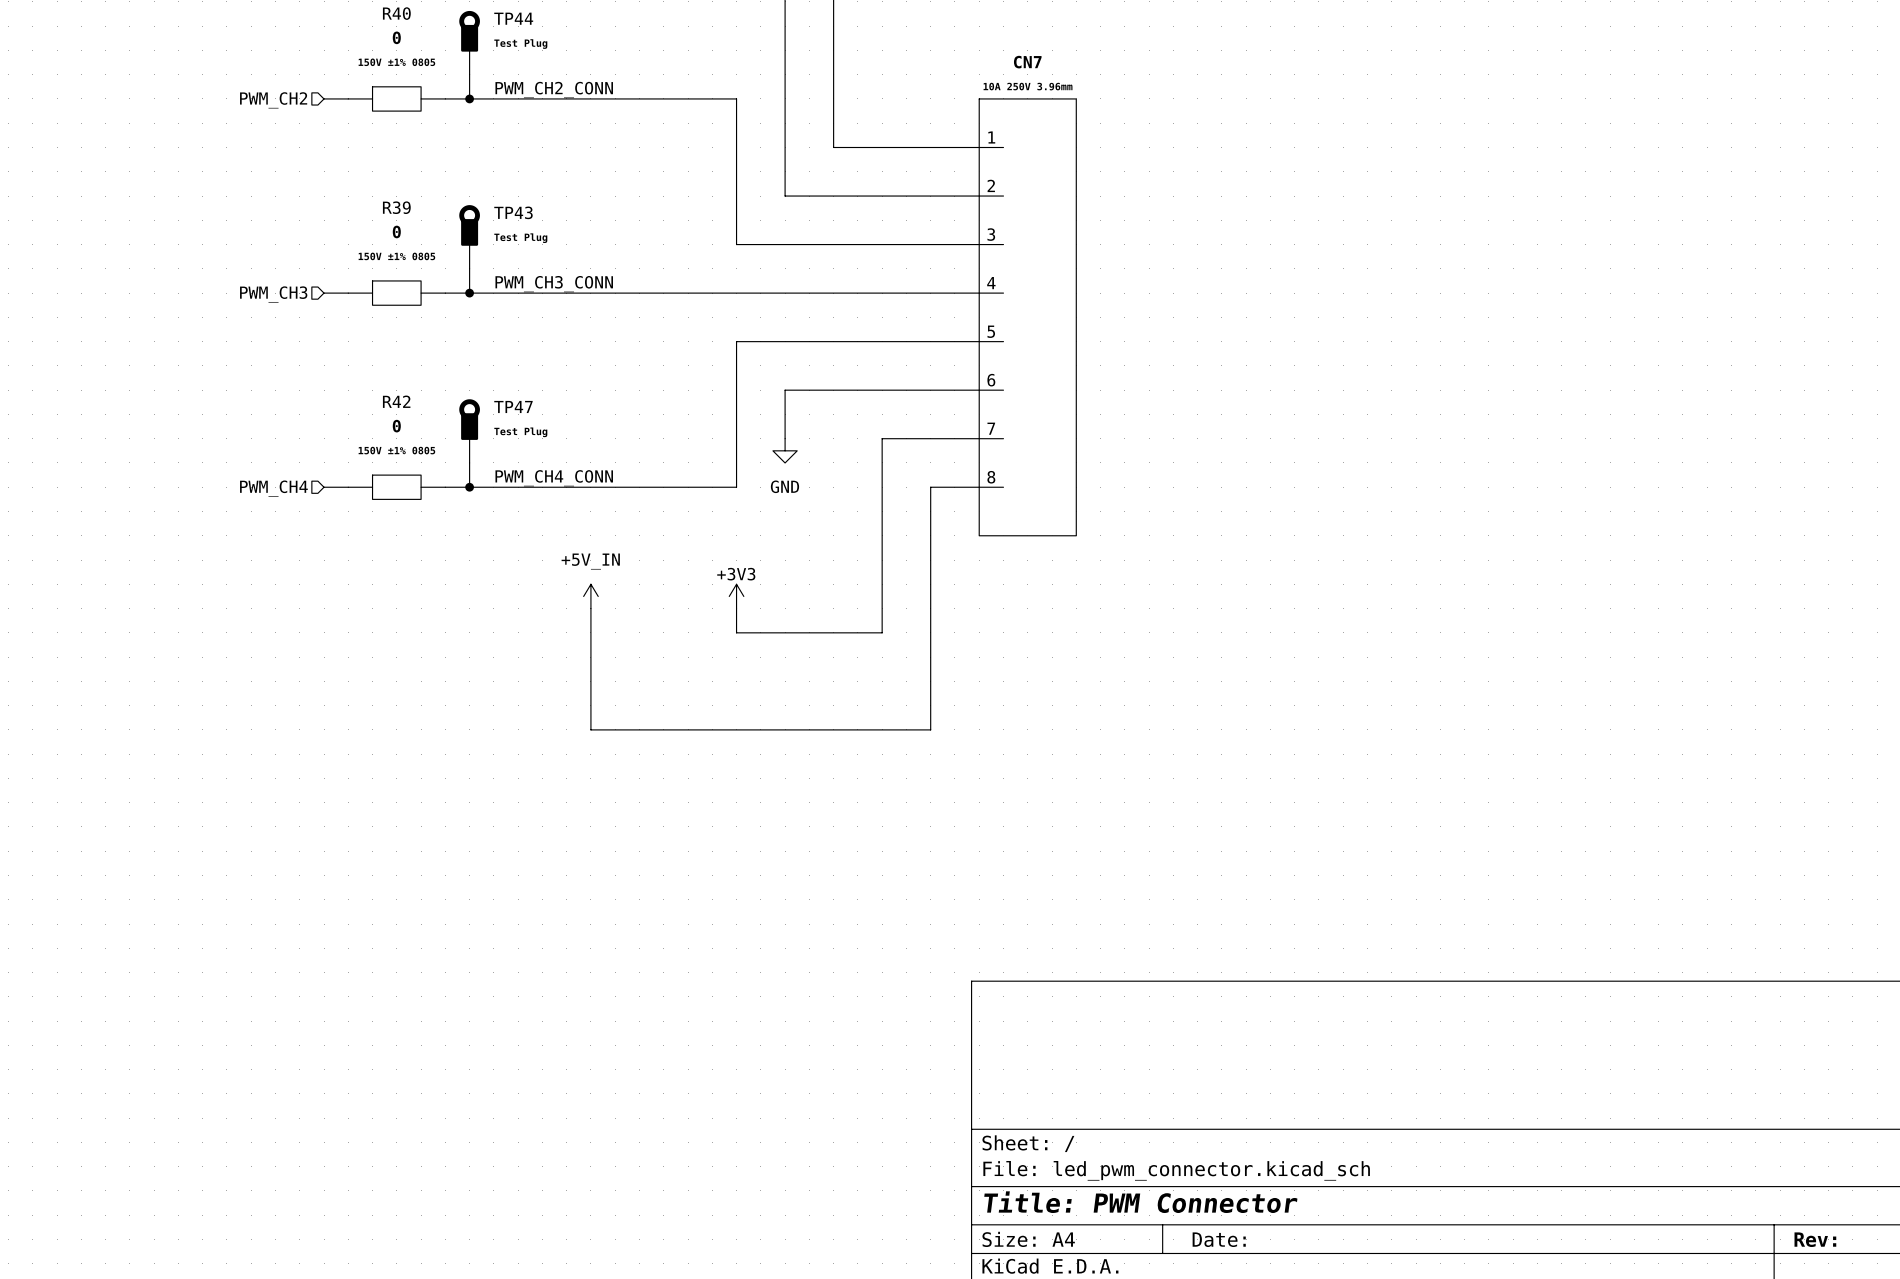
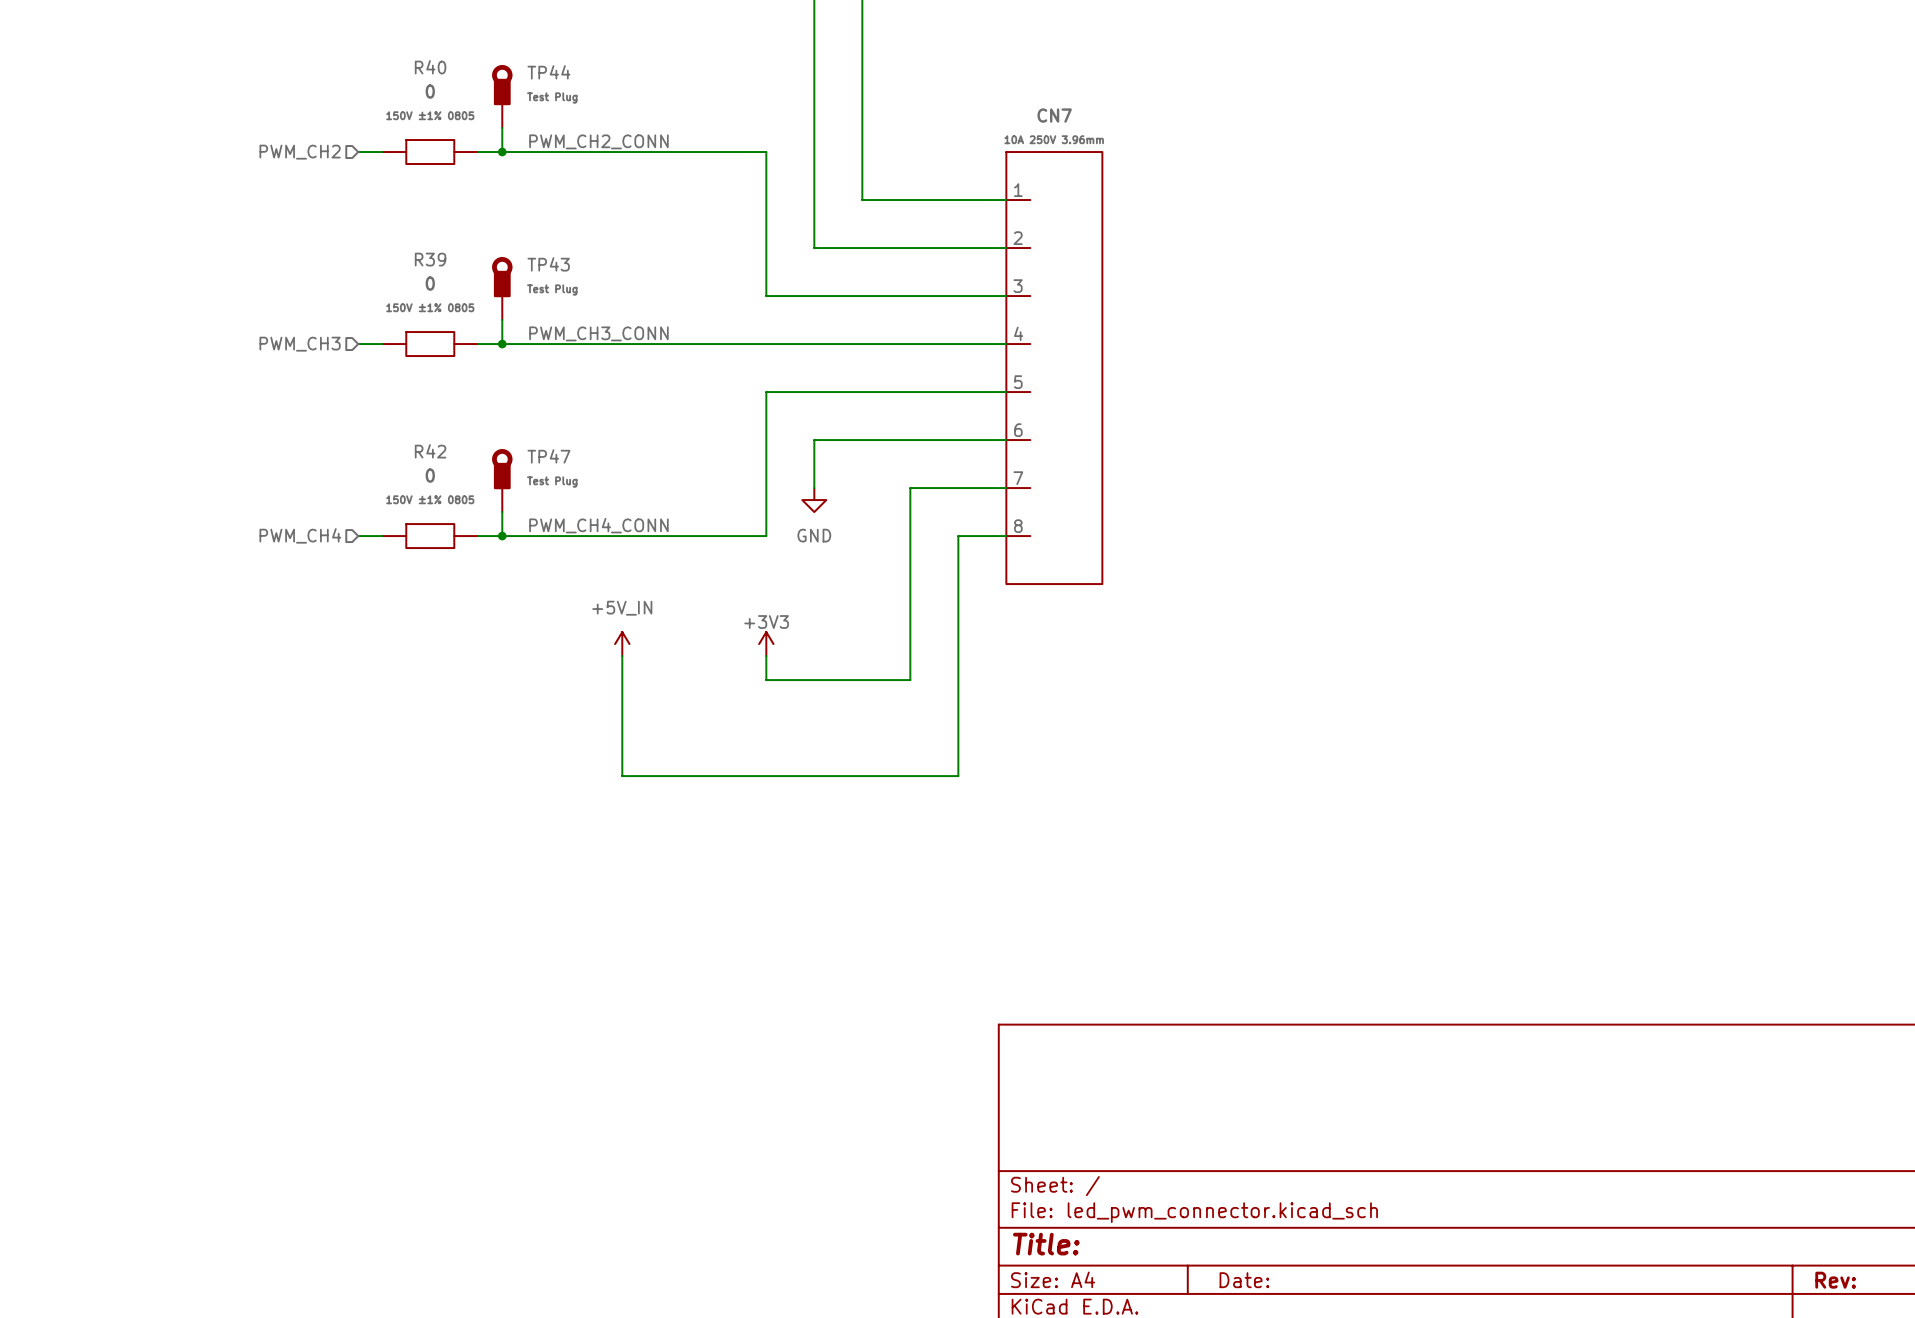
title block: Title: PWM Connector (1140, 1202) -> Title: (1046, 1244)

